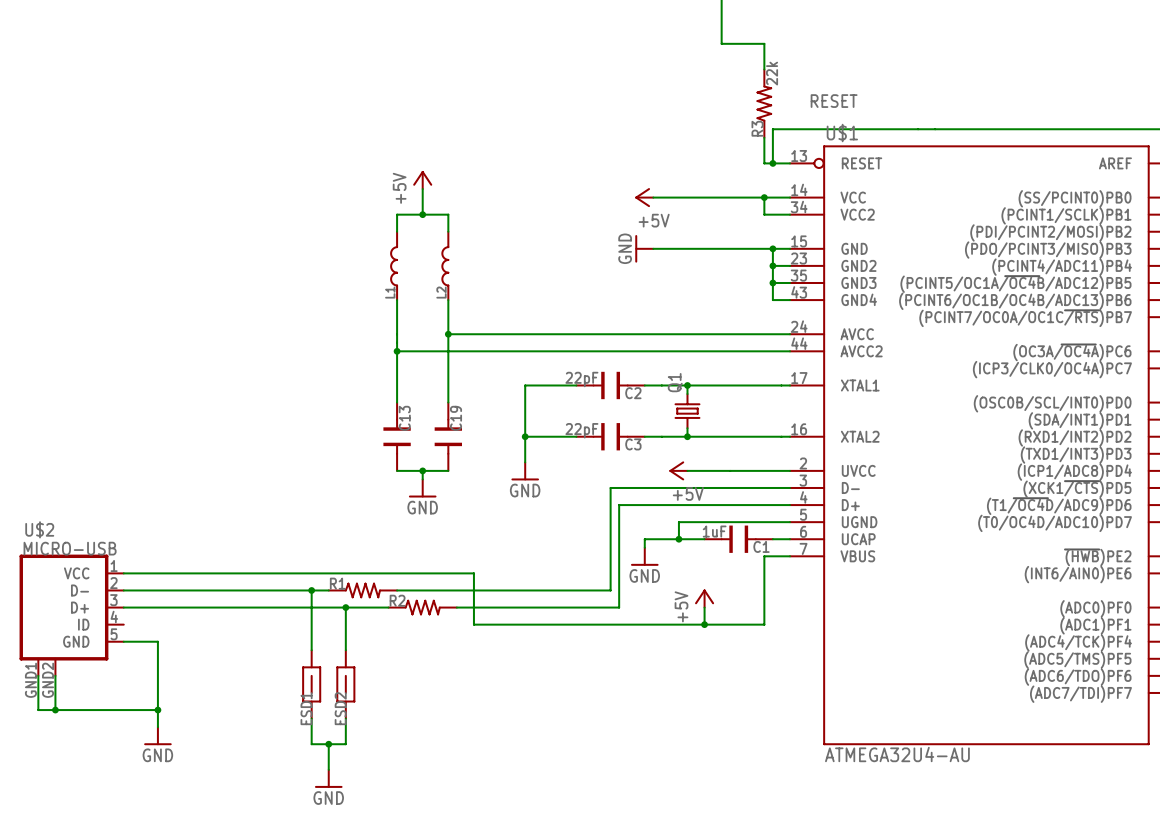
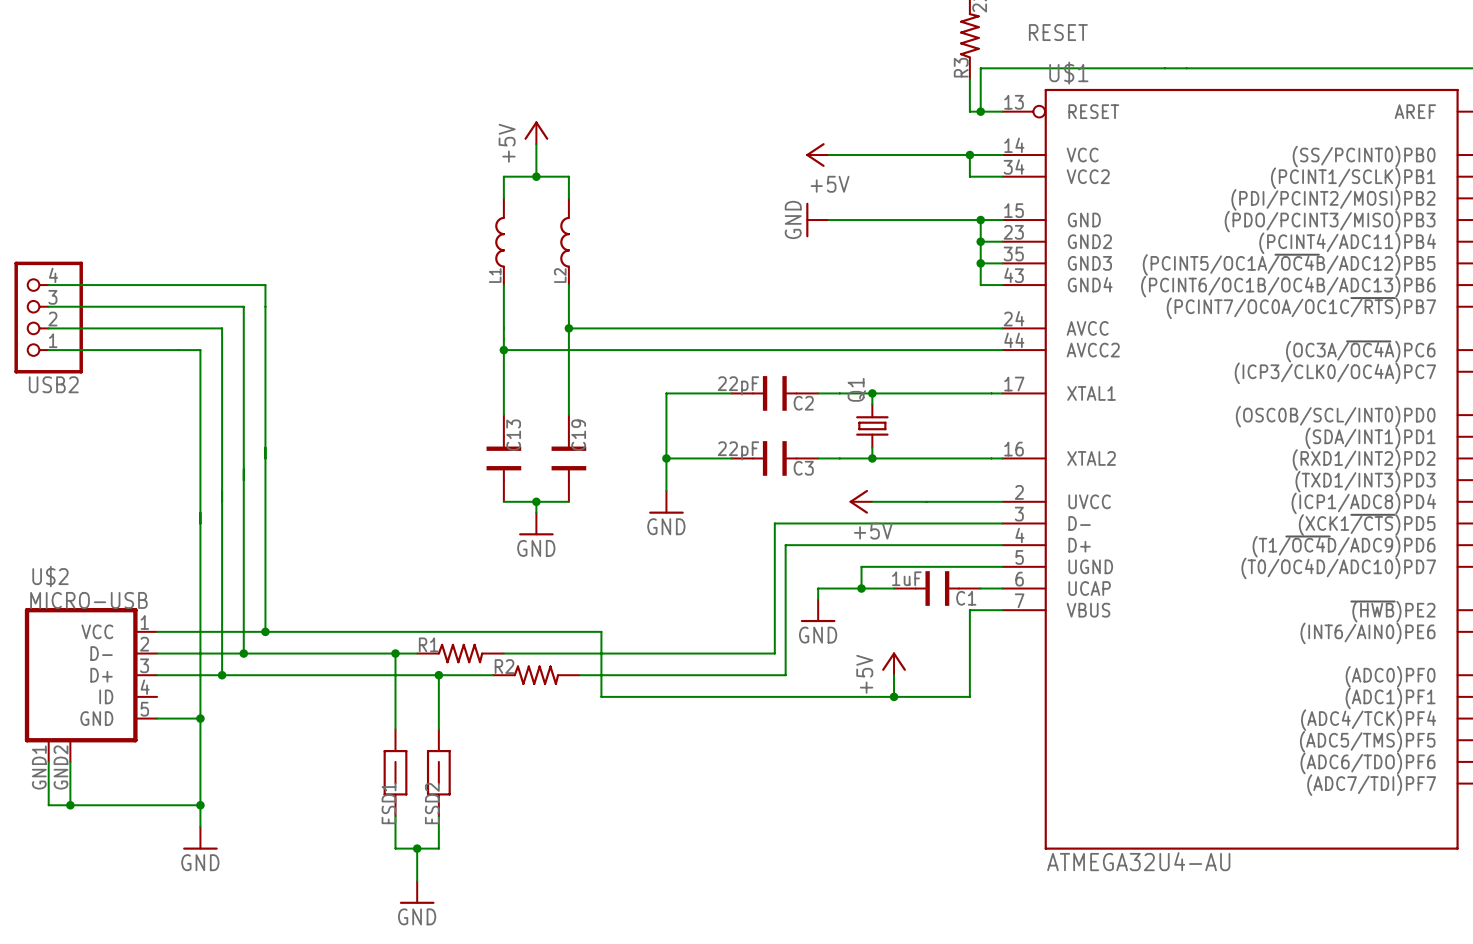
wire: none -> (48, 285) (265, 285) (265, 631)
wire: none -> (48, 306) (243, 306) (243, 653)
USB2: none -> (48, 317)
wire: none -> (48, 328) (222, 328) (222, 675)
wire: none -> (48, 350) (200, 350) (200, 718)
junction: none -> (265, 631)
junction: none -> (243, 653)
junction: none -> (222, 675)
junction: none -> (200, 718)

